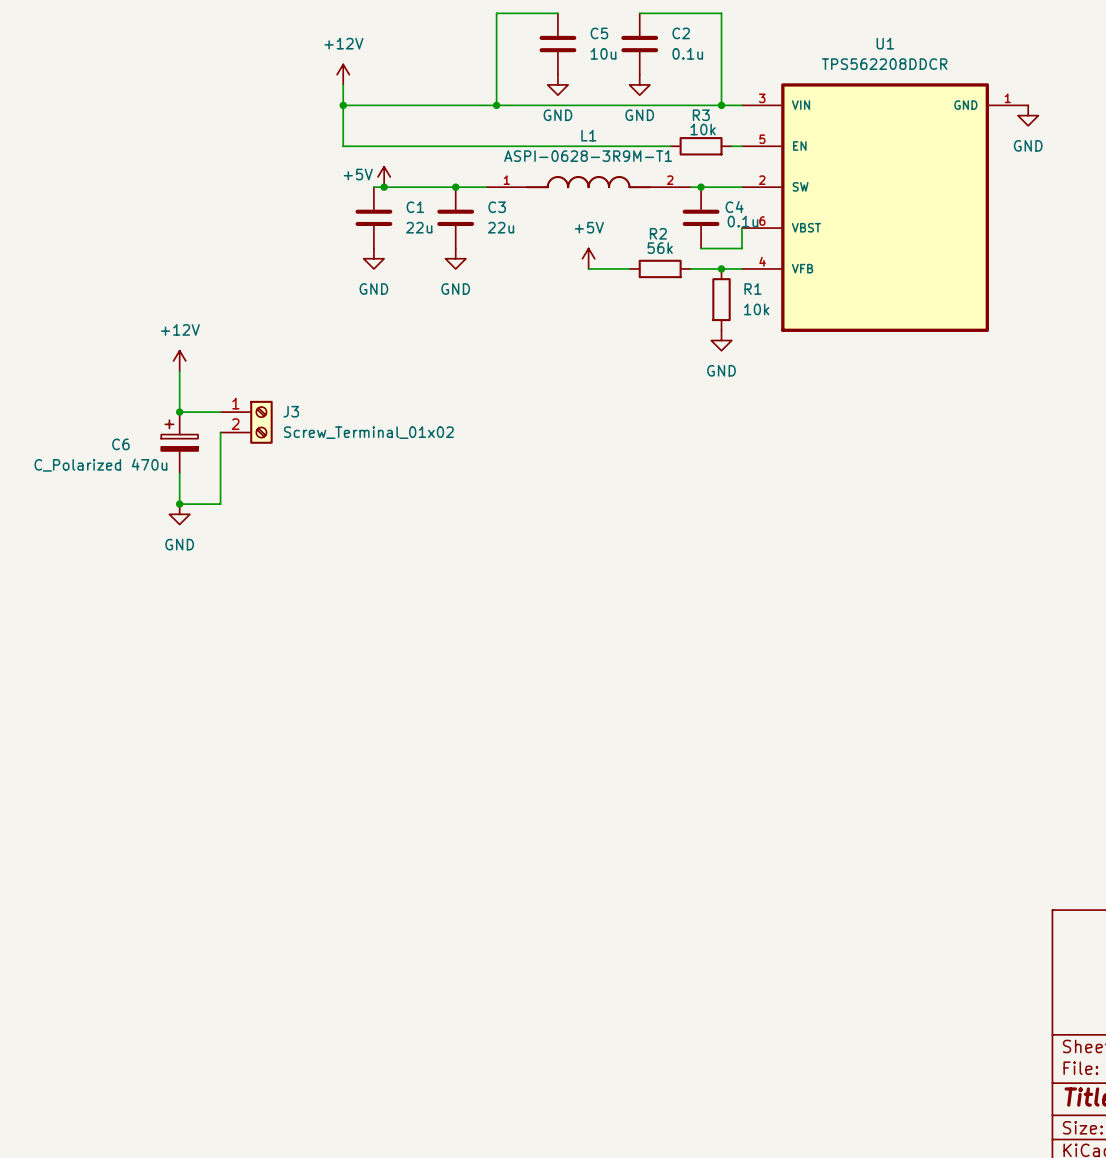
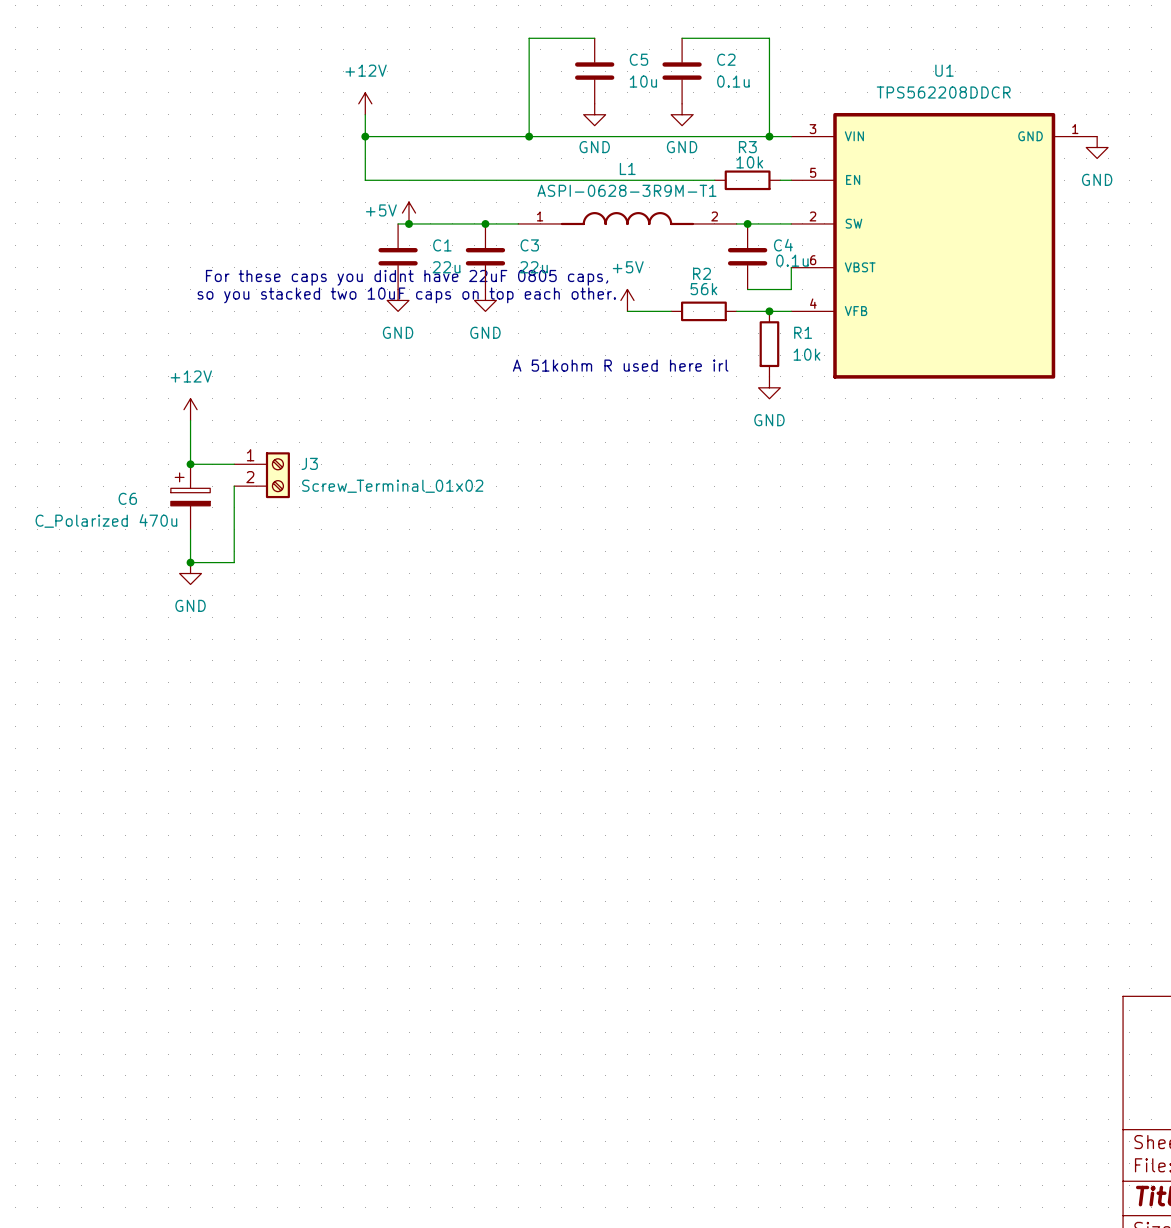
text: none -> For these caps you didnt have 22uF 0805 caps, (407, 277)
text: none -> so you stacked two 10uF caps on top each other. (406, 295)
text: none -> A 51kohm R used here irl (620, 365)

